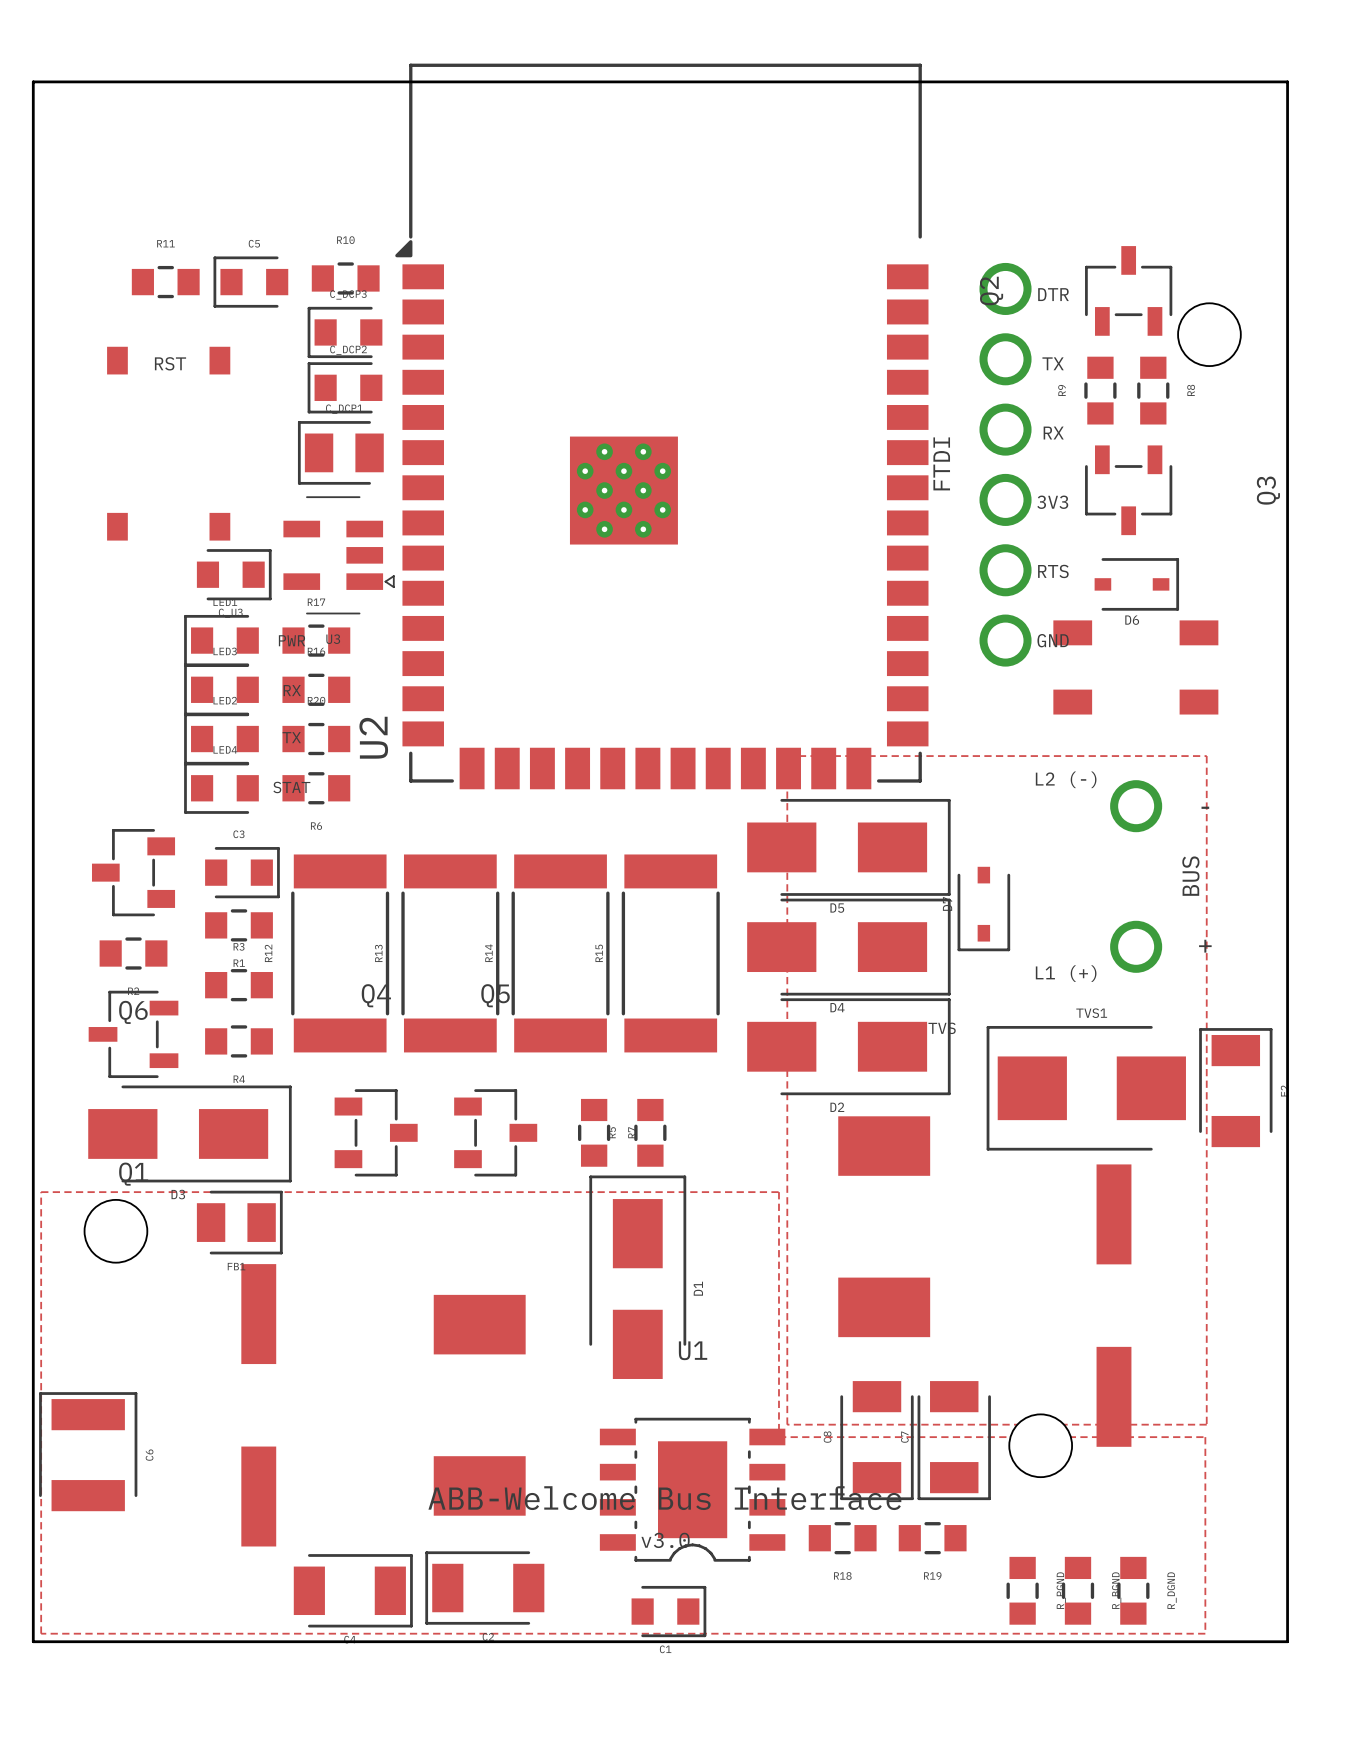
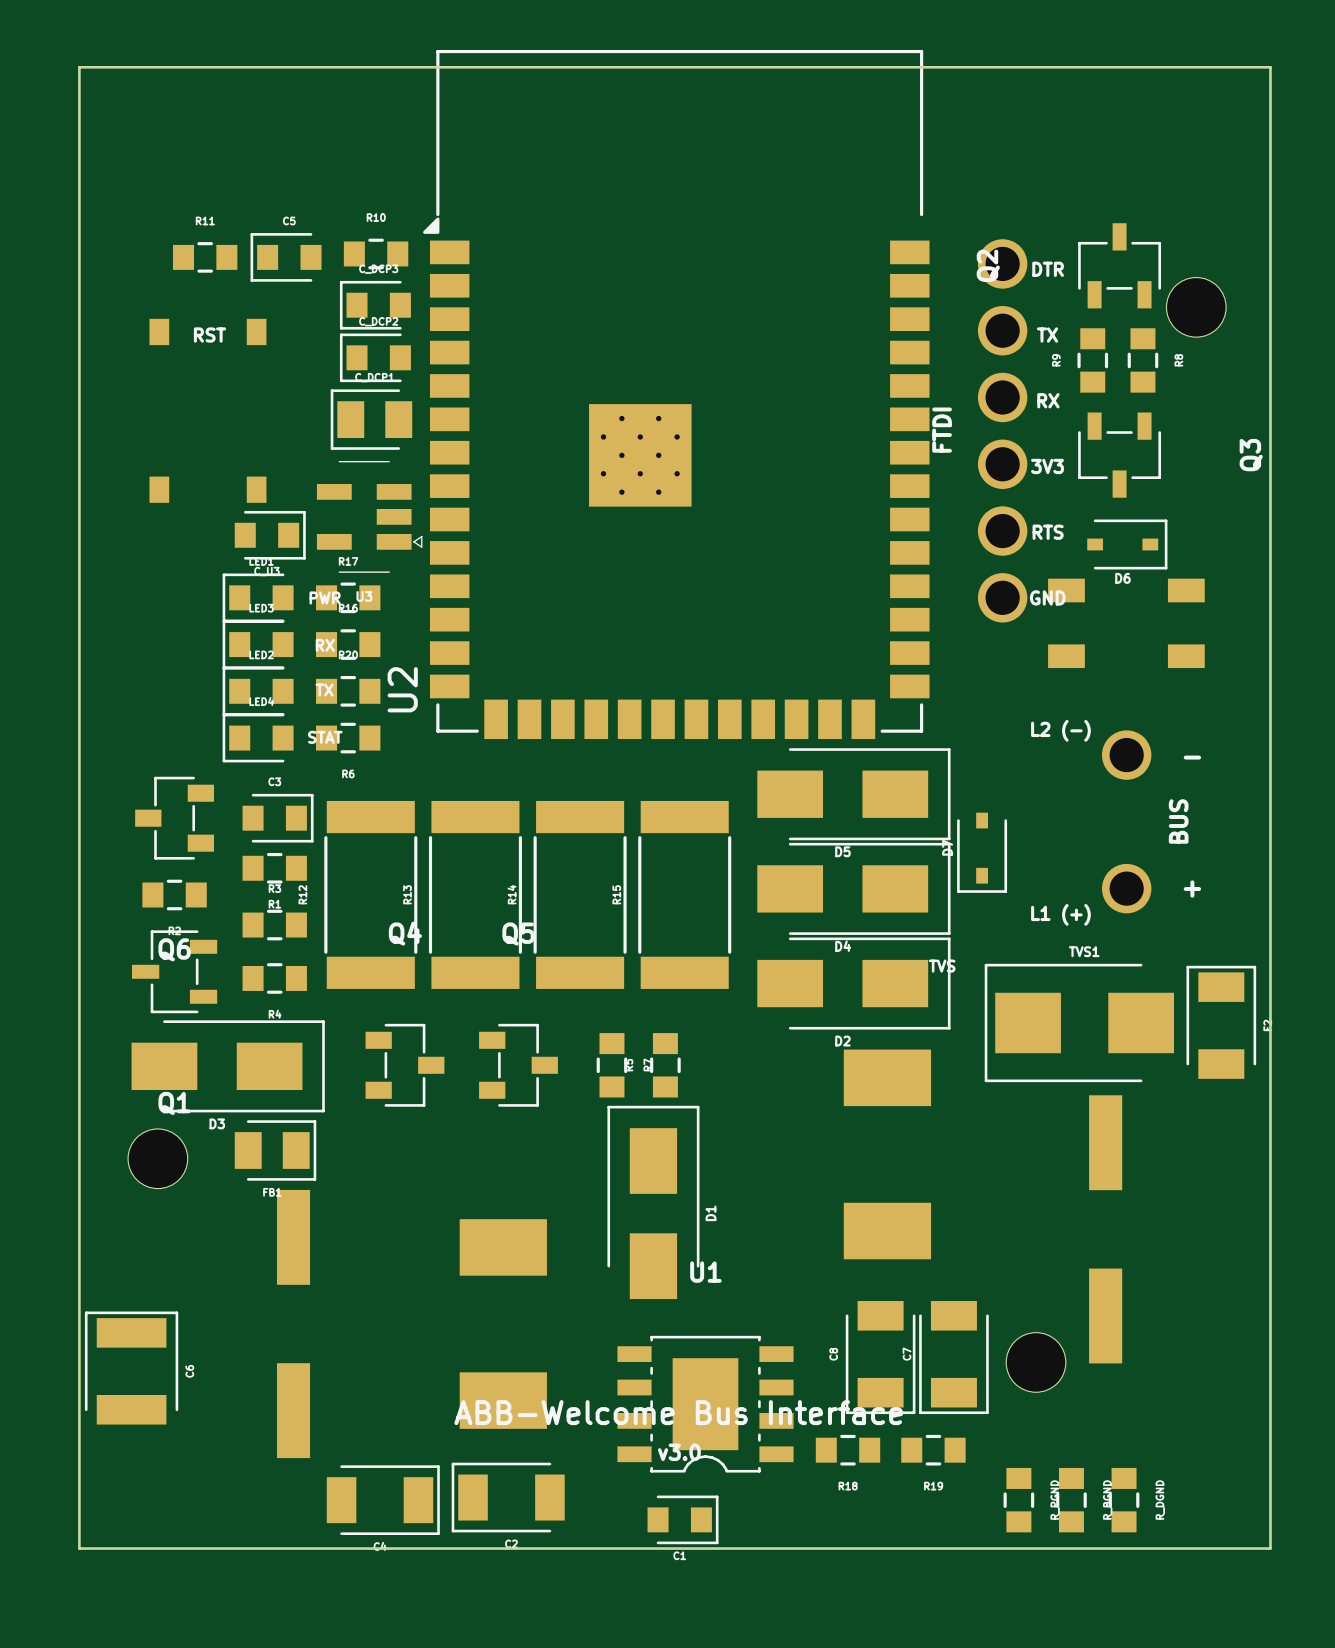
zone outline: (787, 756) (1206, 756) (1206, 1424) (787, 1424) (787, 756) -> none
zone outline: (41, 1192) (778, 1192) (778, 1437) (1205, 1437) (1205, 1633) (41, 1633) (41, 1192) -> none

